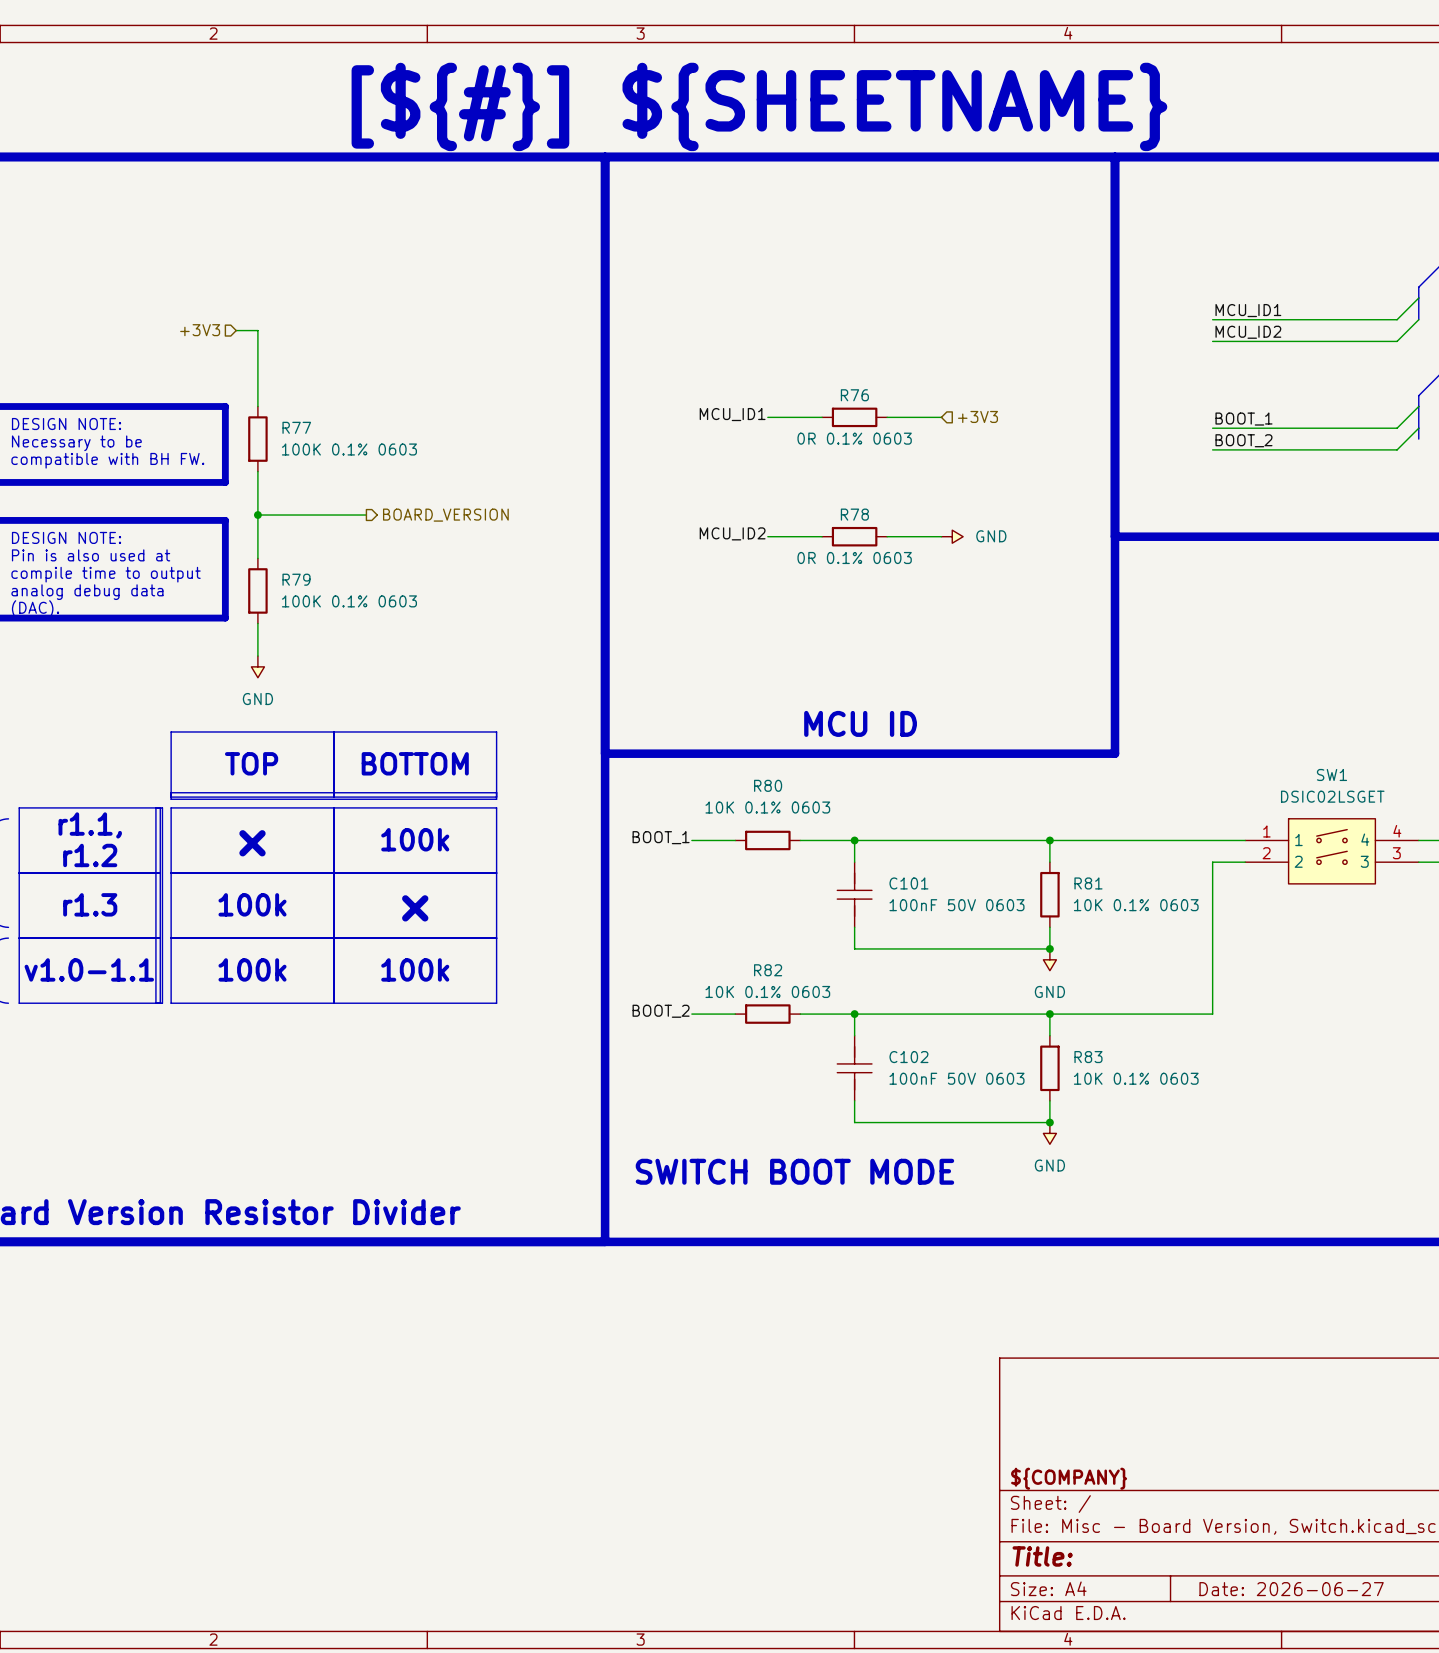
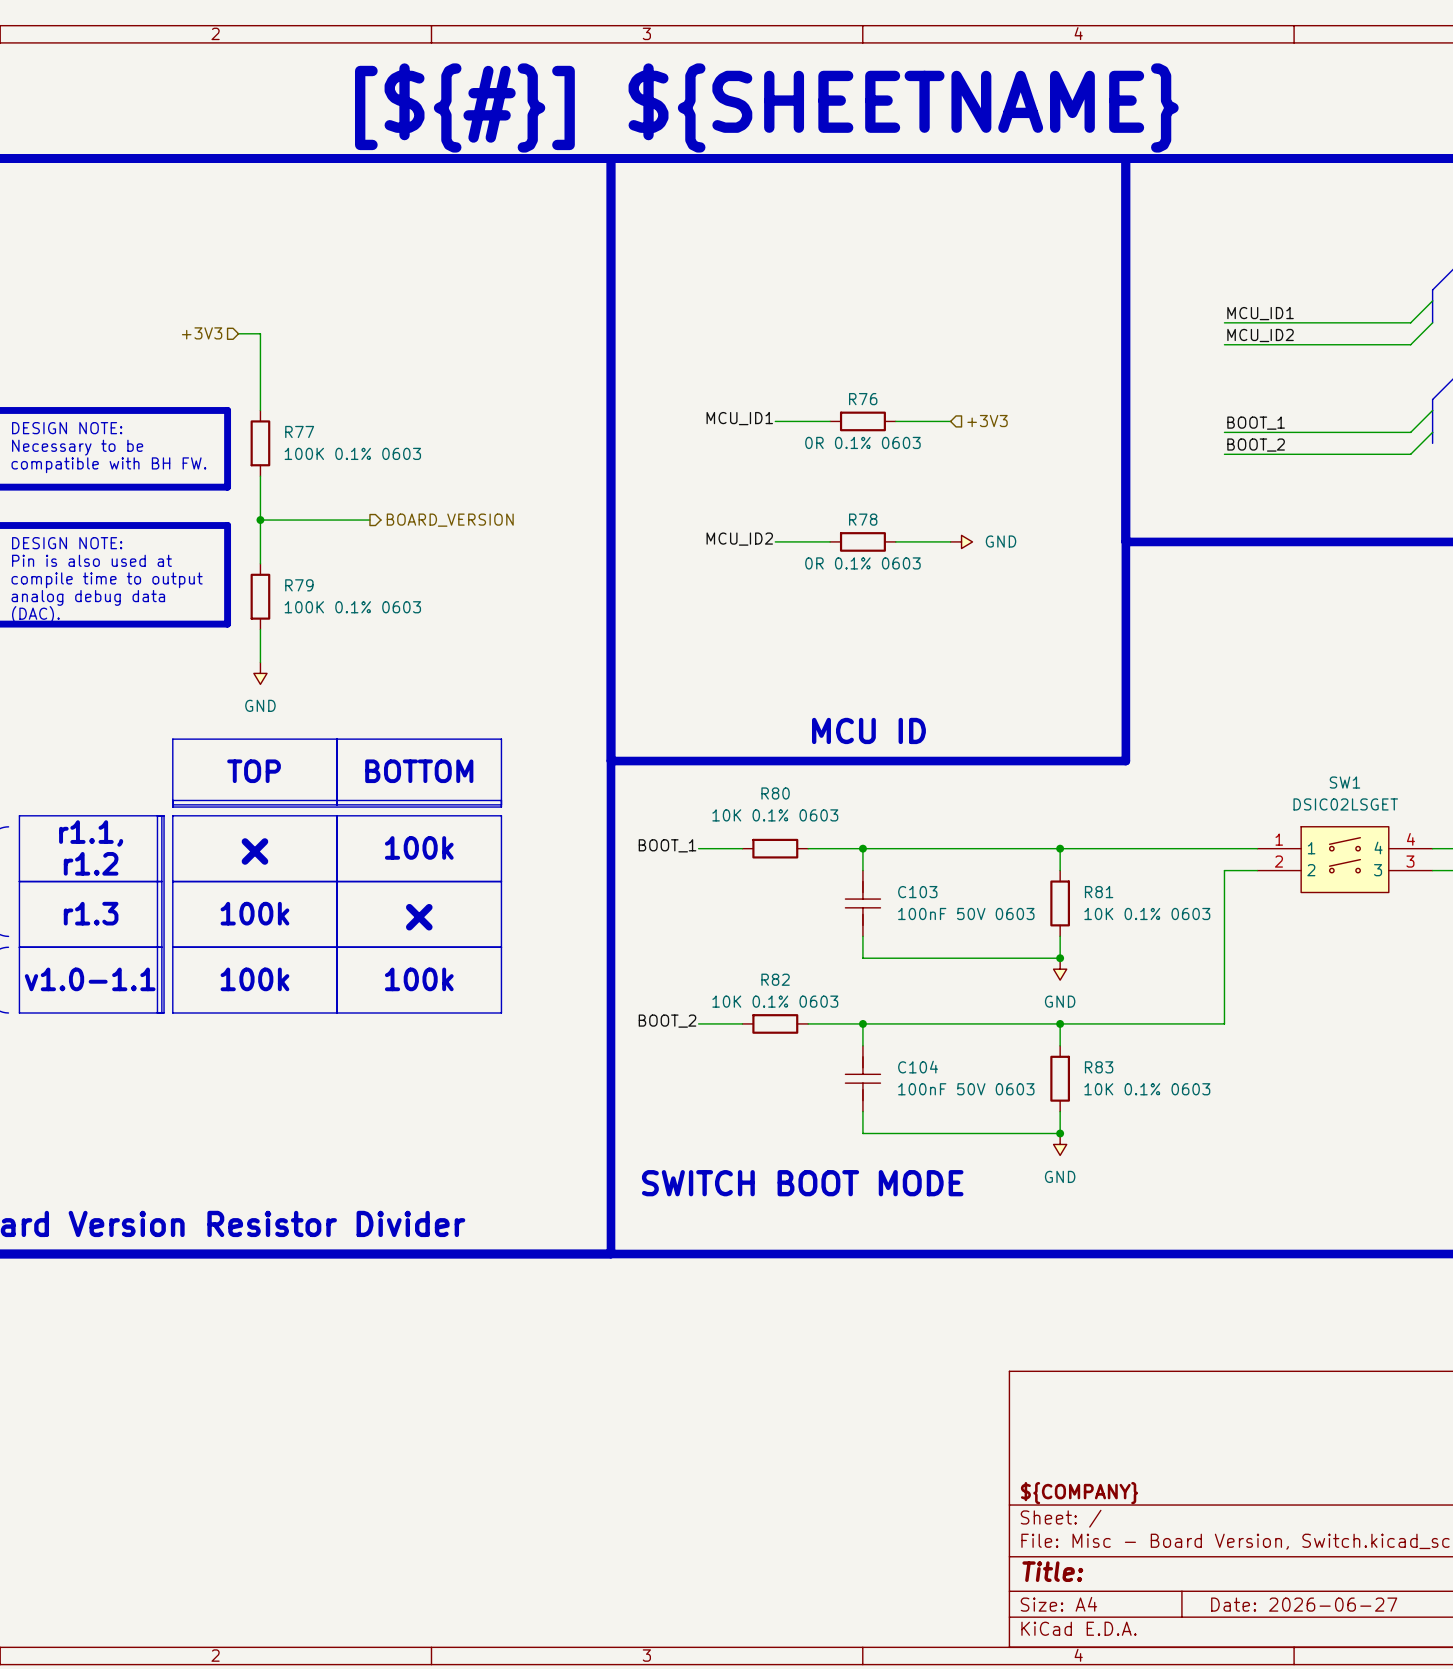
C101 name: C101 (908, 883) -> C103 (917, 892)
C102 name: C102 (908, 1057) -> C104 (918, 1067)

